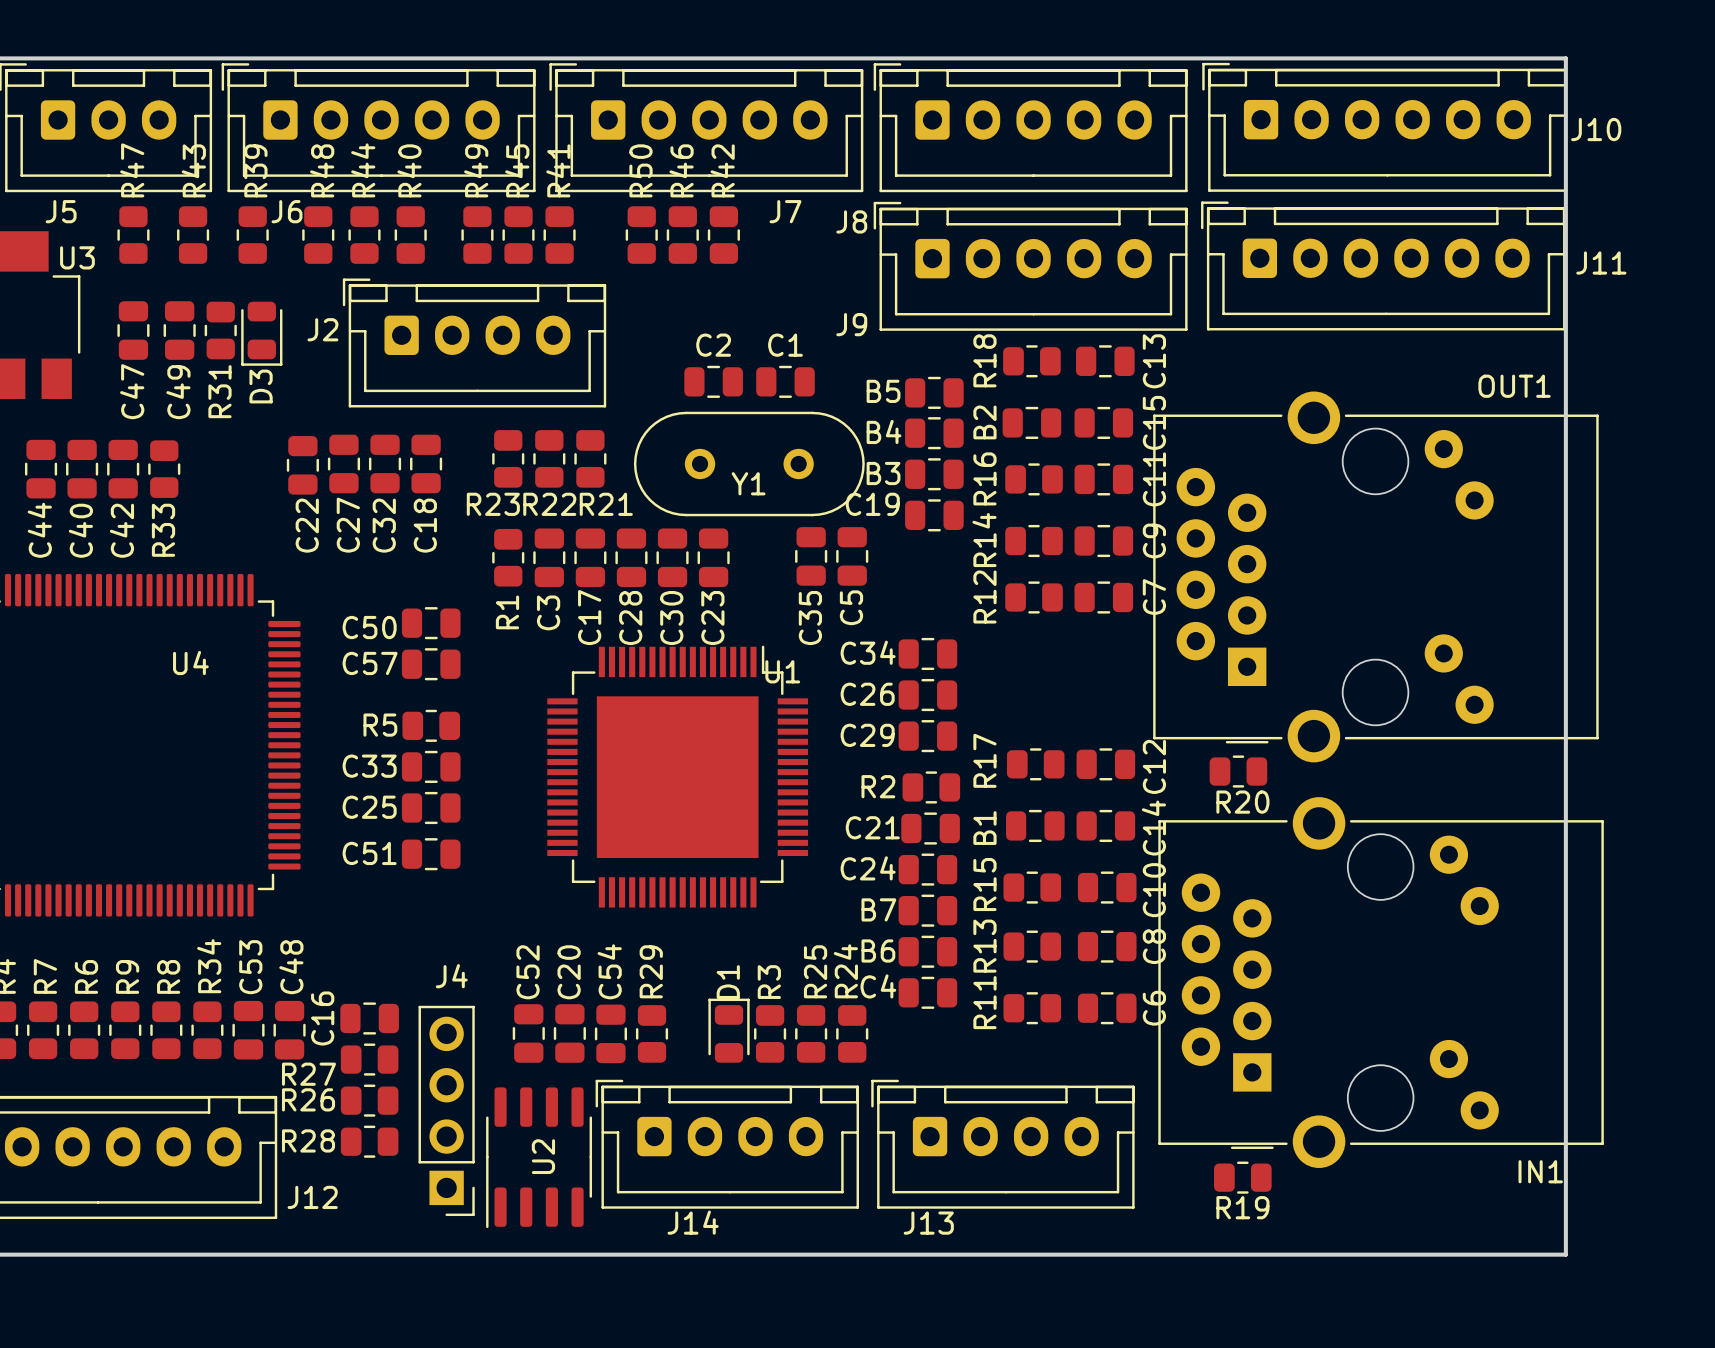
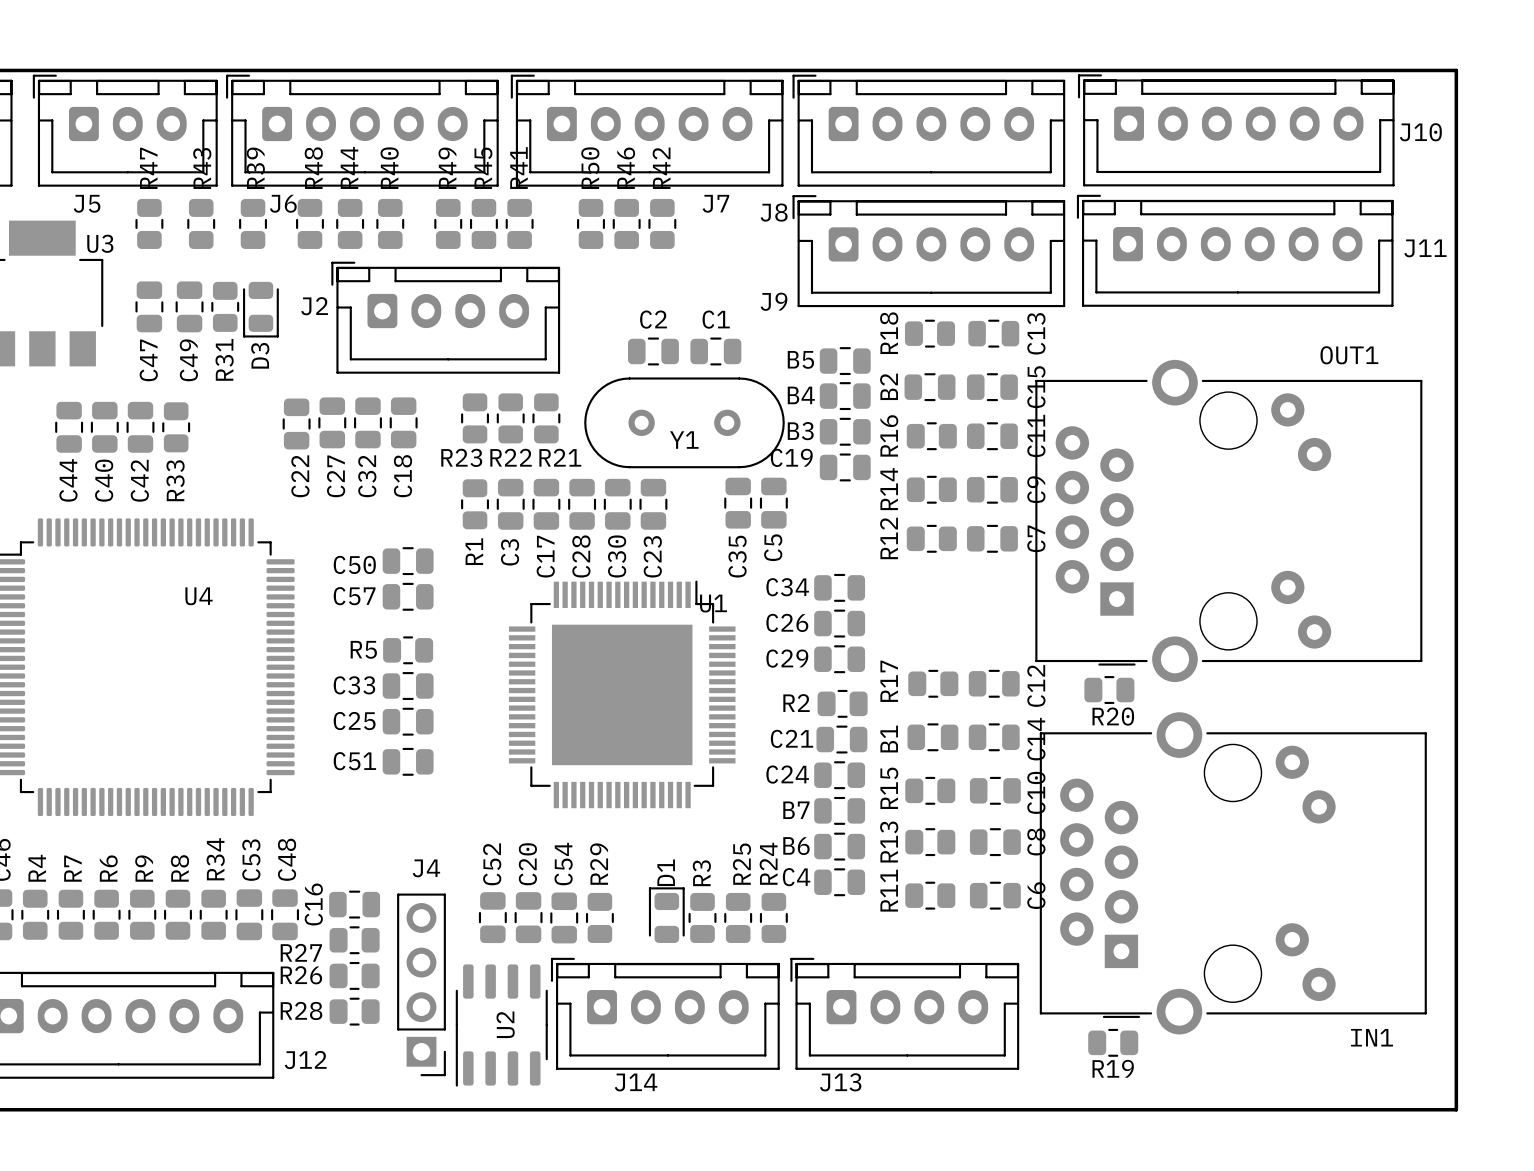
board edge: (1565, 58) (1565, 1254) -> (1393, 70) (1456, 70) (1456, 1109) (1393, 1109)

